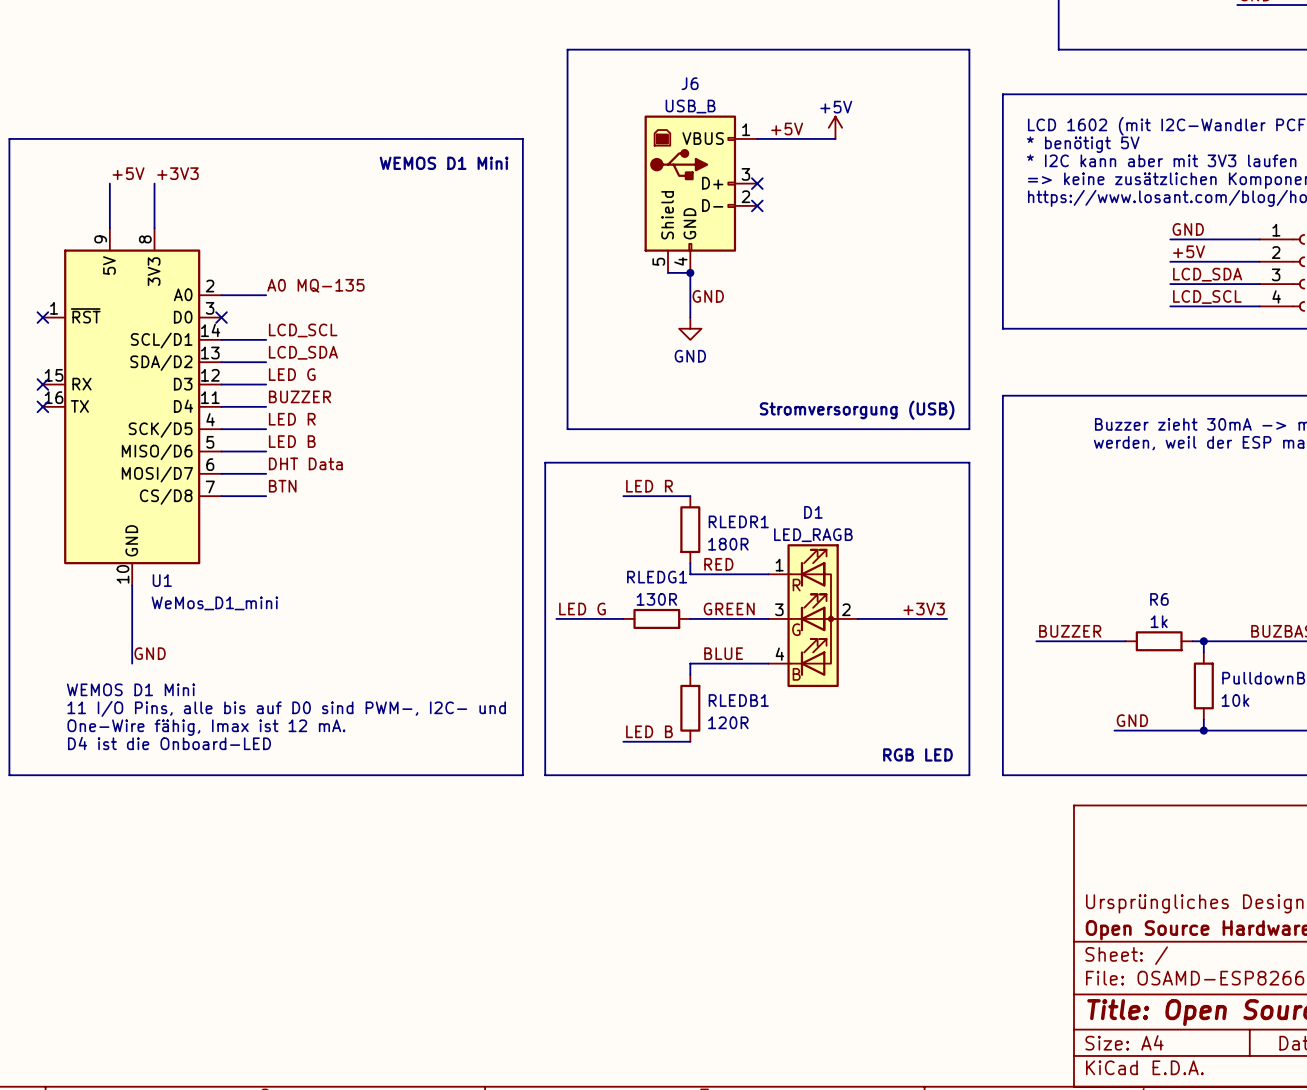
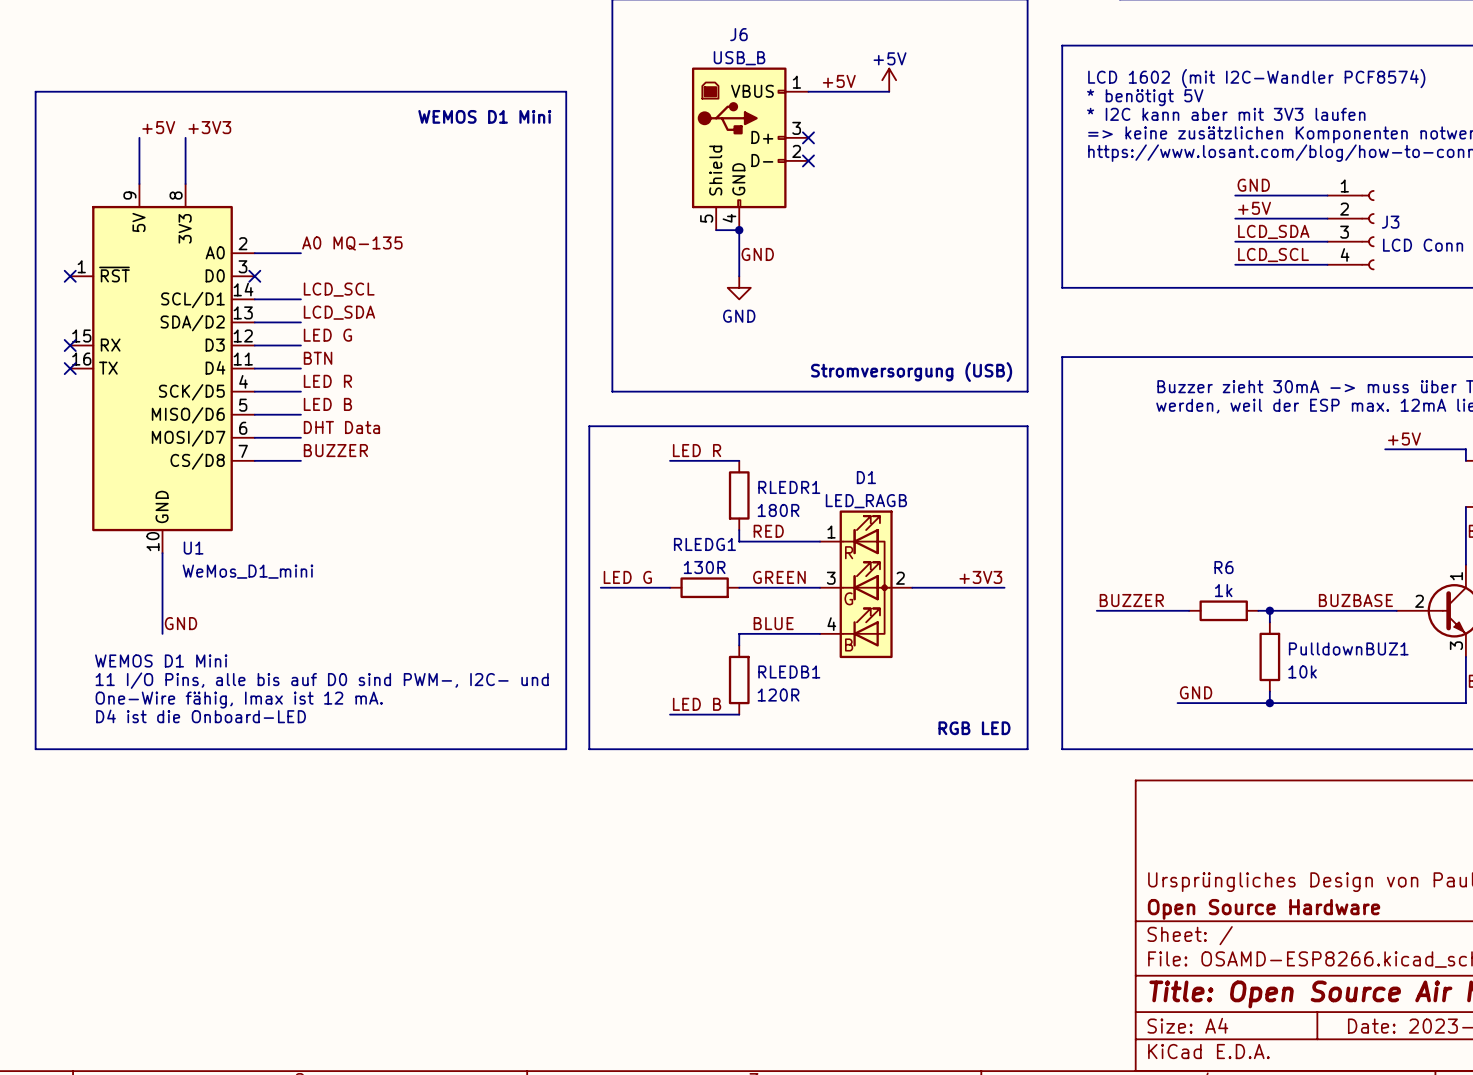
label: BUZZER (299, 396) -> BTN (318, 358)
label: BTN (282, 486) -> BUZZER (335, 450)

